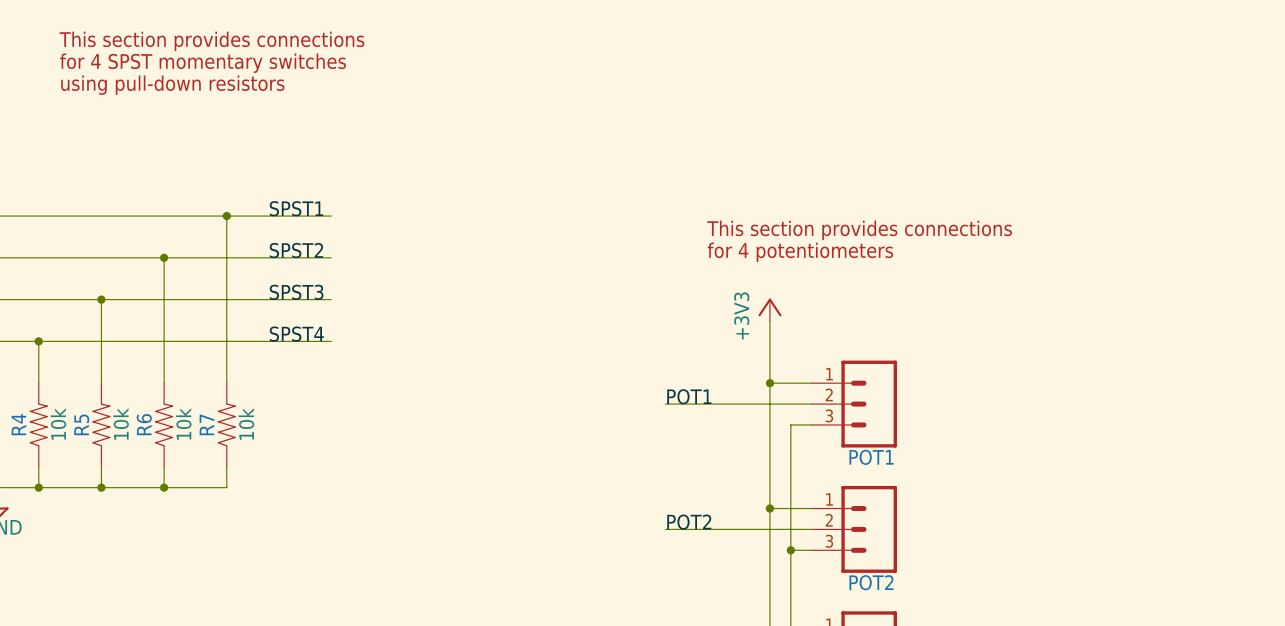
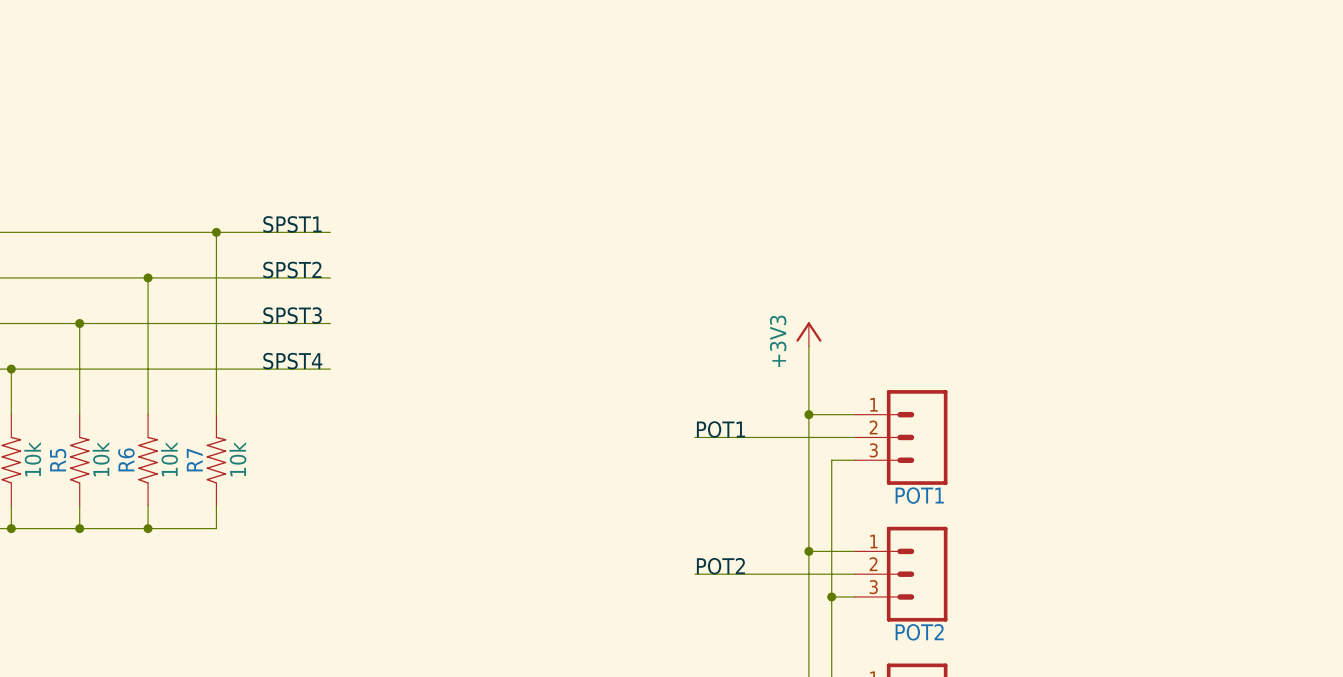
text: This section provides connections (211, 41) -> none
text: for 4 SPST momentary switches (203, 63) -> none
text: using pull-down resistors (172, 85) -> none
text: This section provides connections (859, 230) -> none
text: for 4 potentiometers (800, 252) -> none

